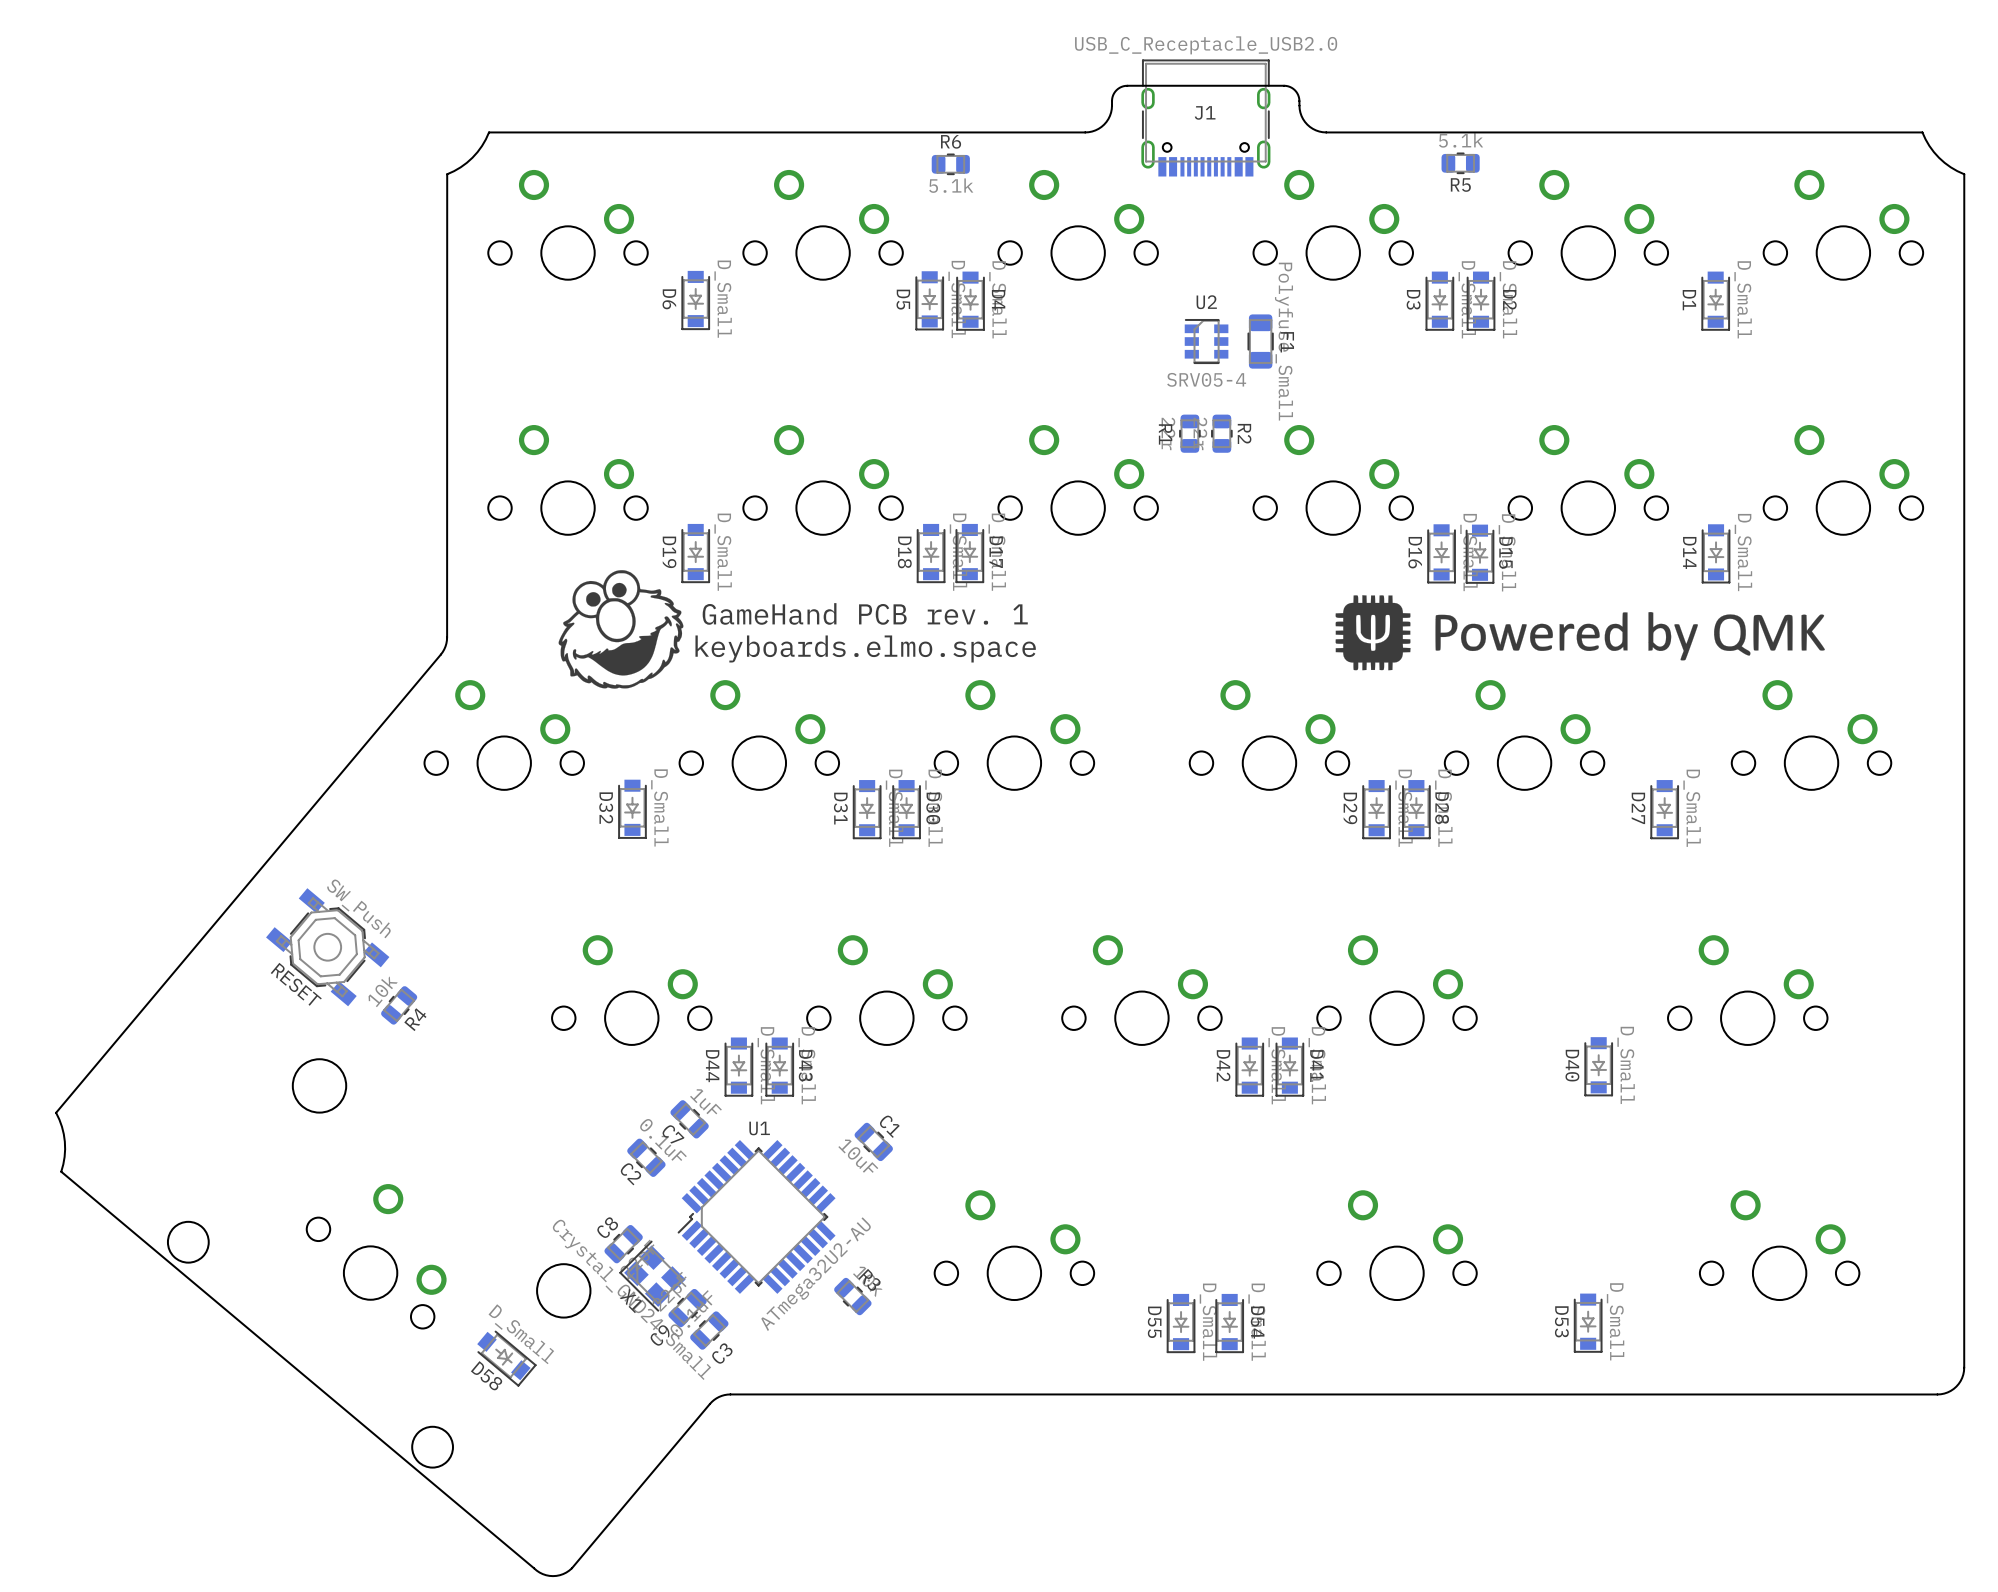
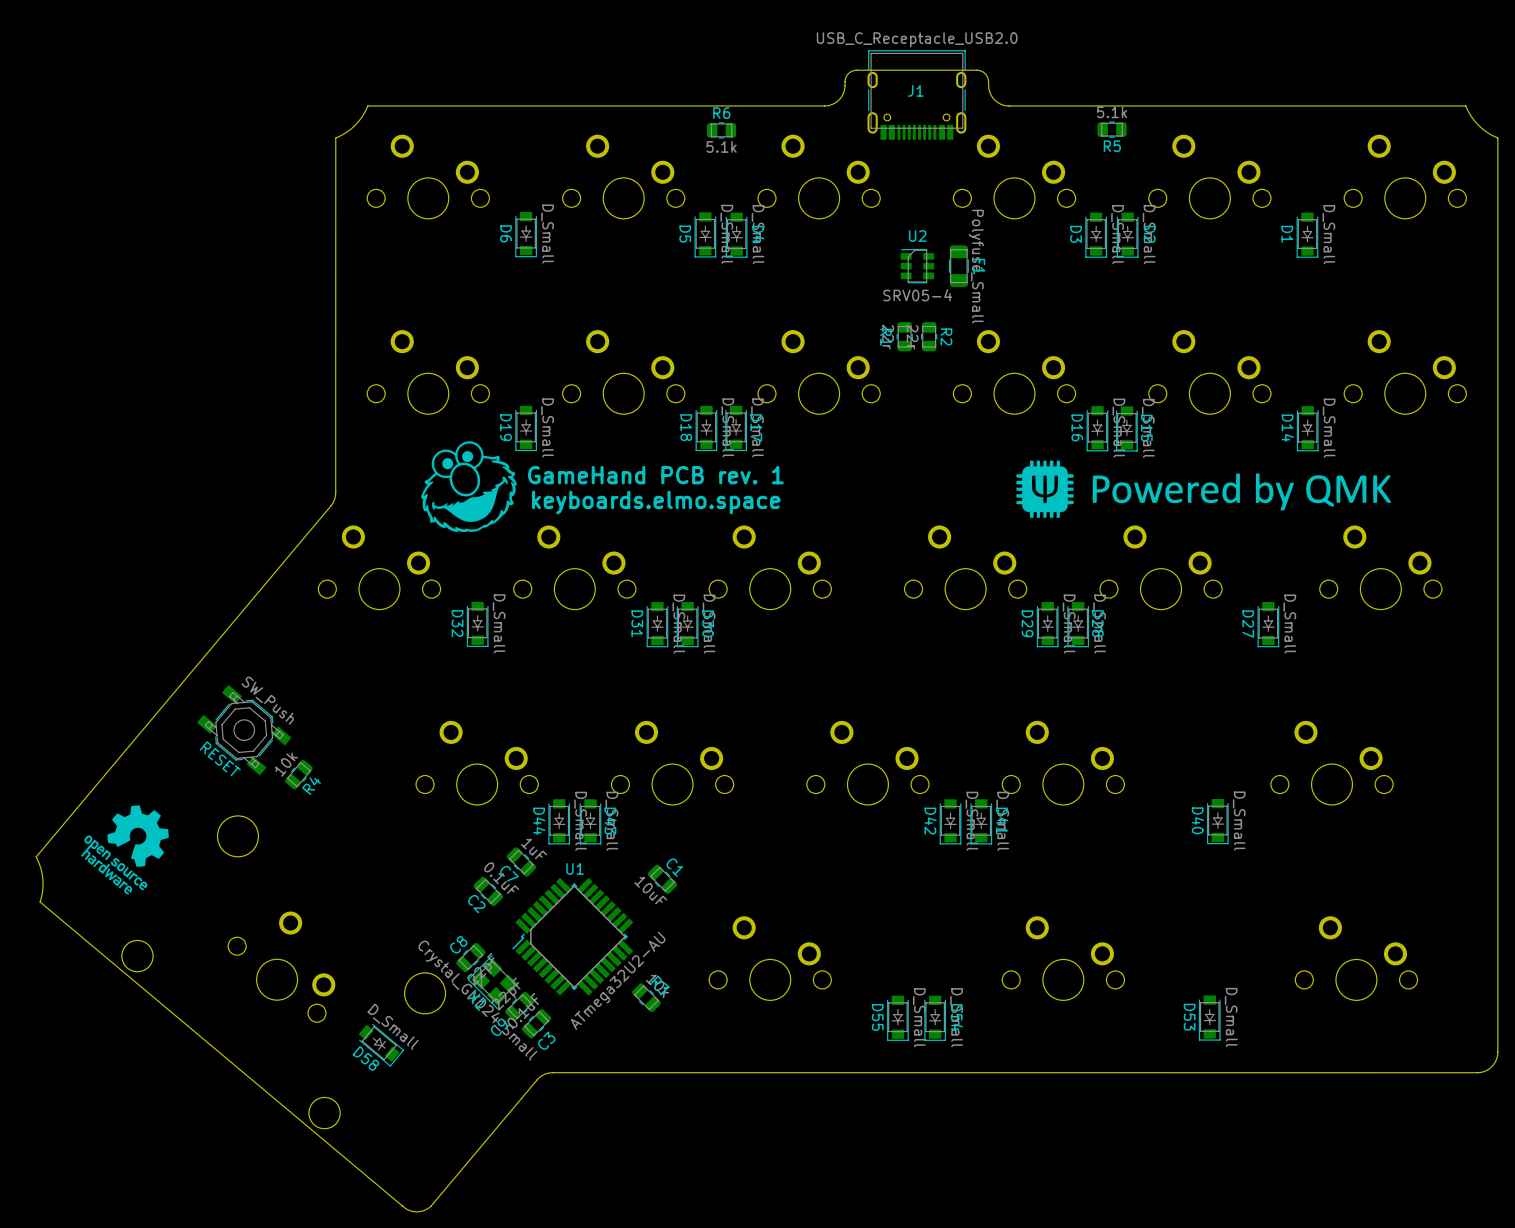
drawing: none -> [80, 805, 169, 895]

